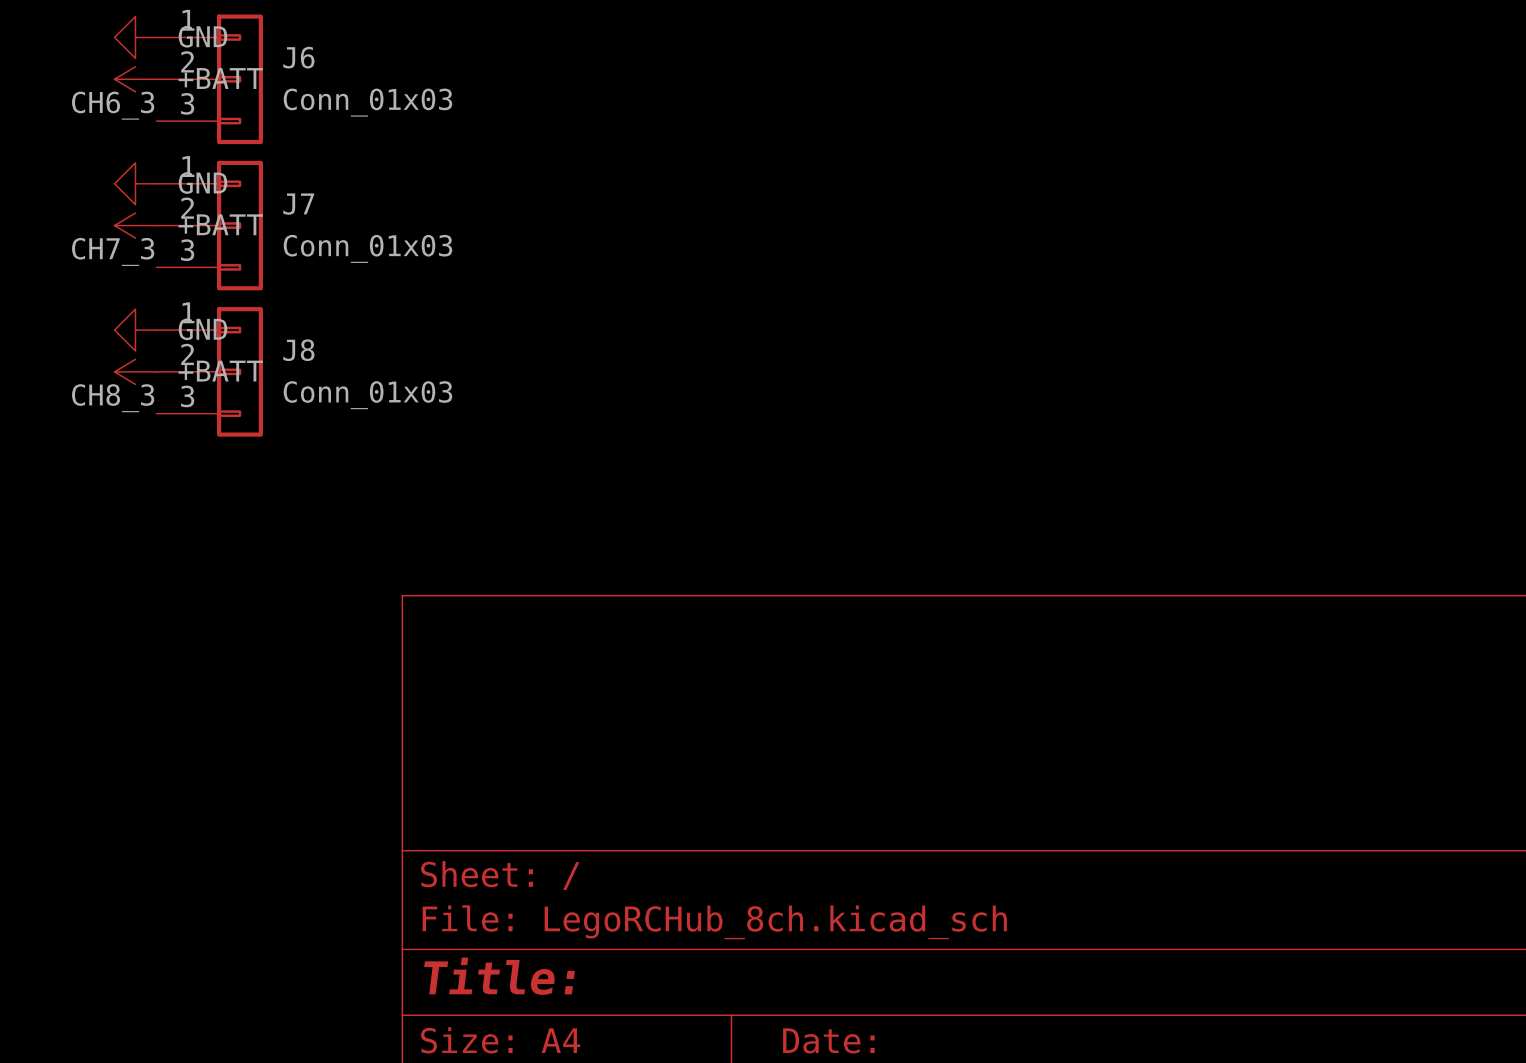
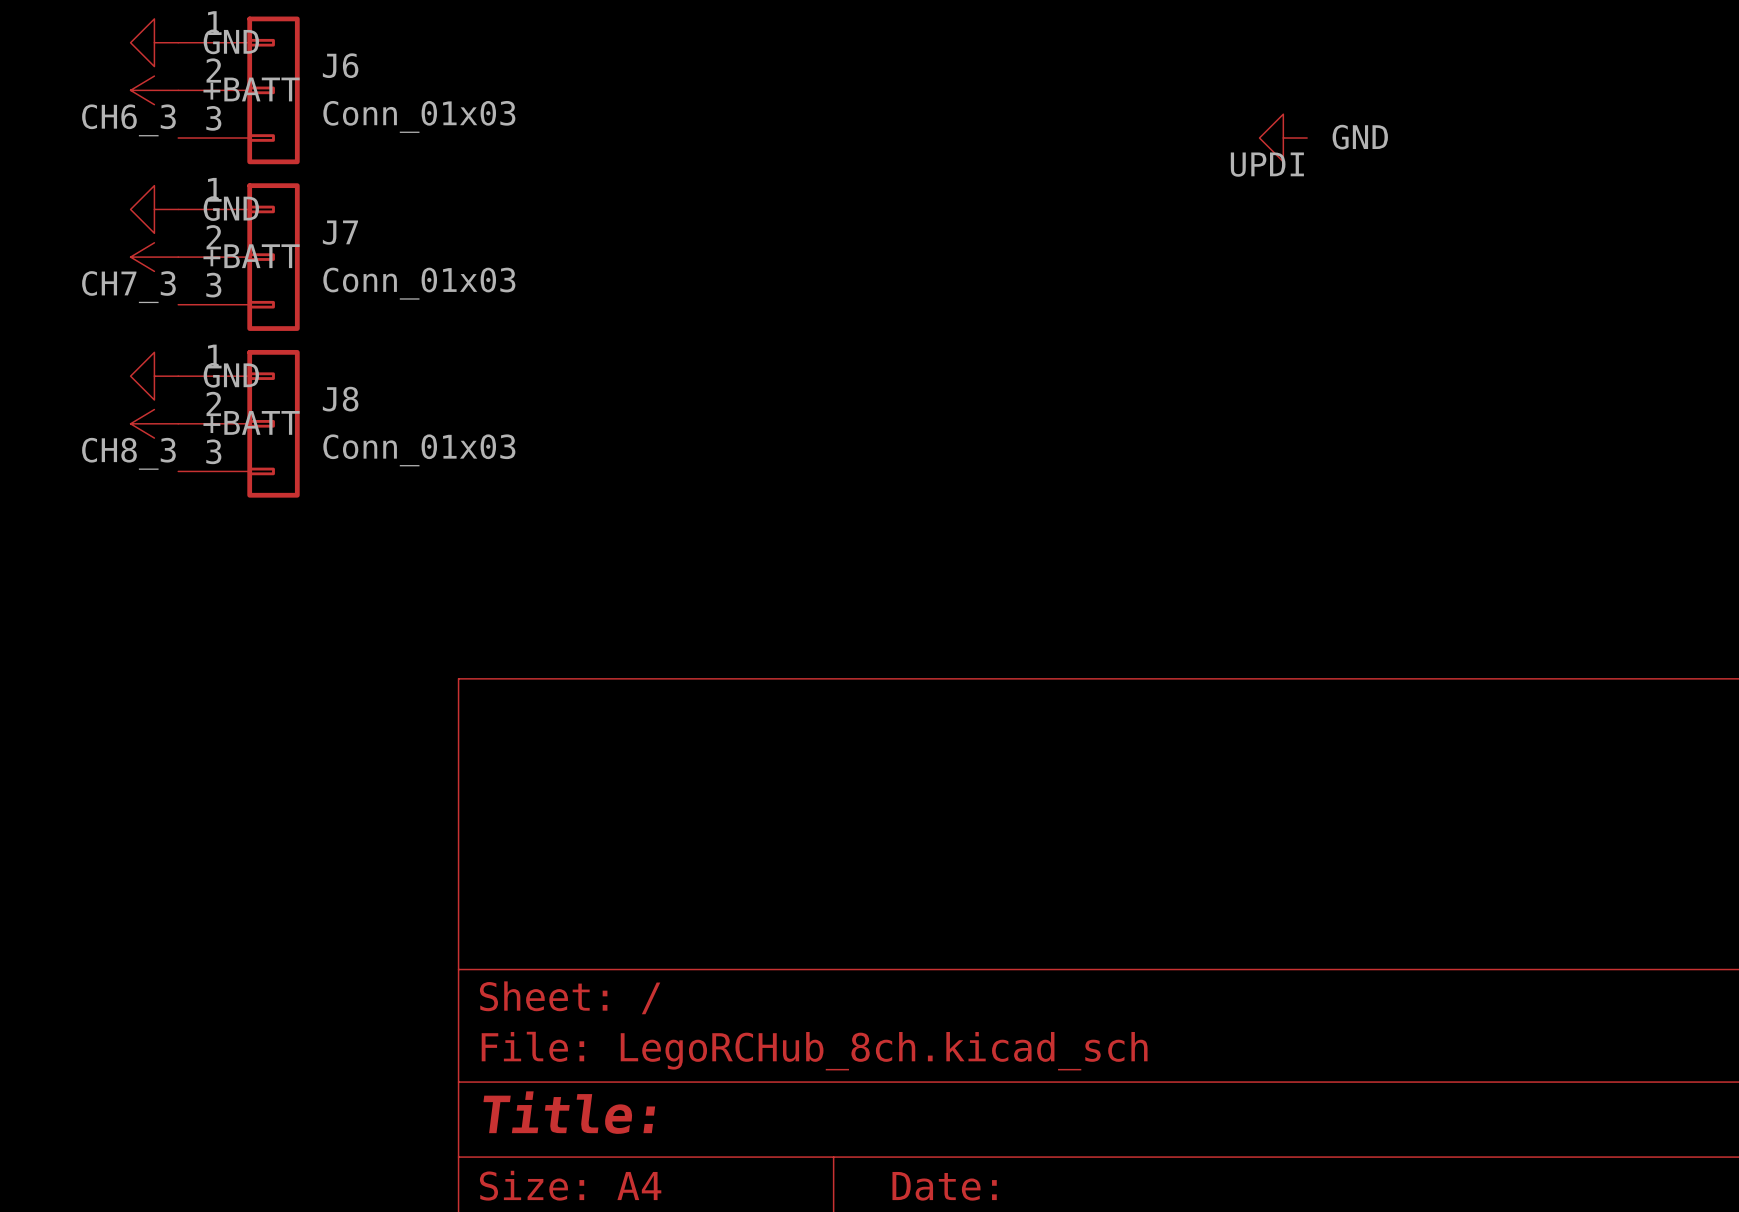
power symbol: none -> GND (1283, 138)
label: none -> UPDI (1267, 164)

